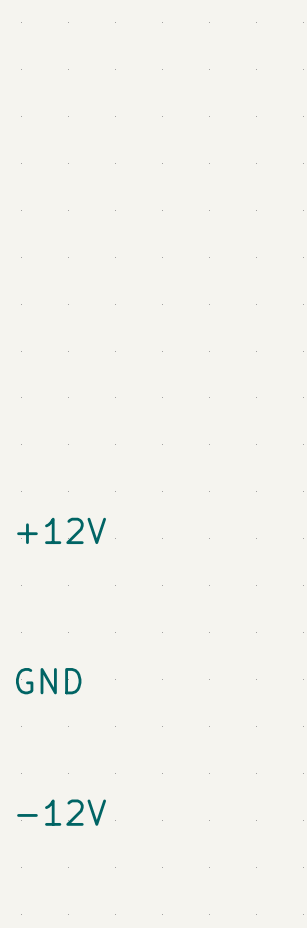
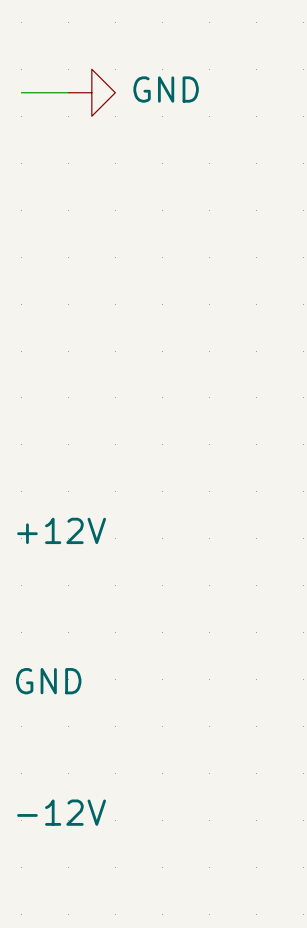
wire: none -> (21, 92) (68, 92)
power symbol: none -> GND (91, 92)

